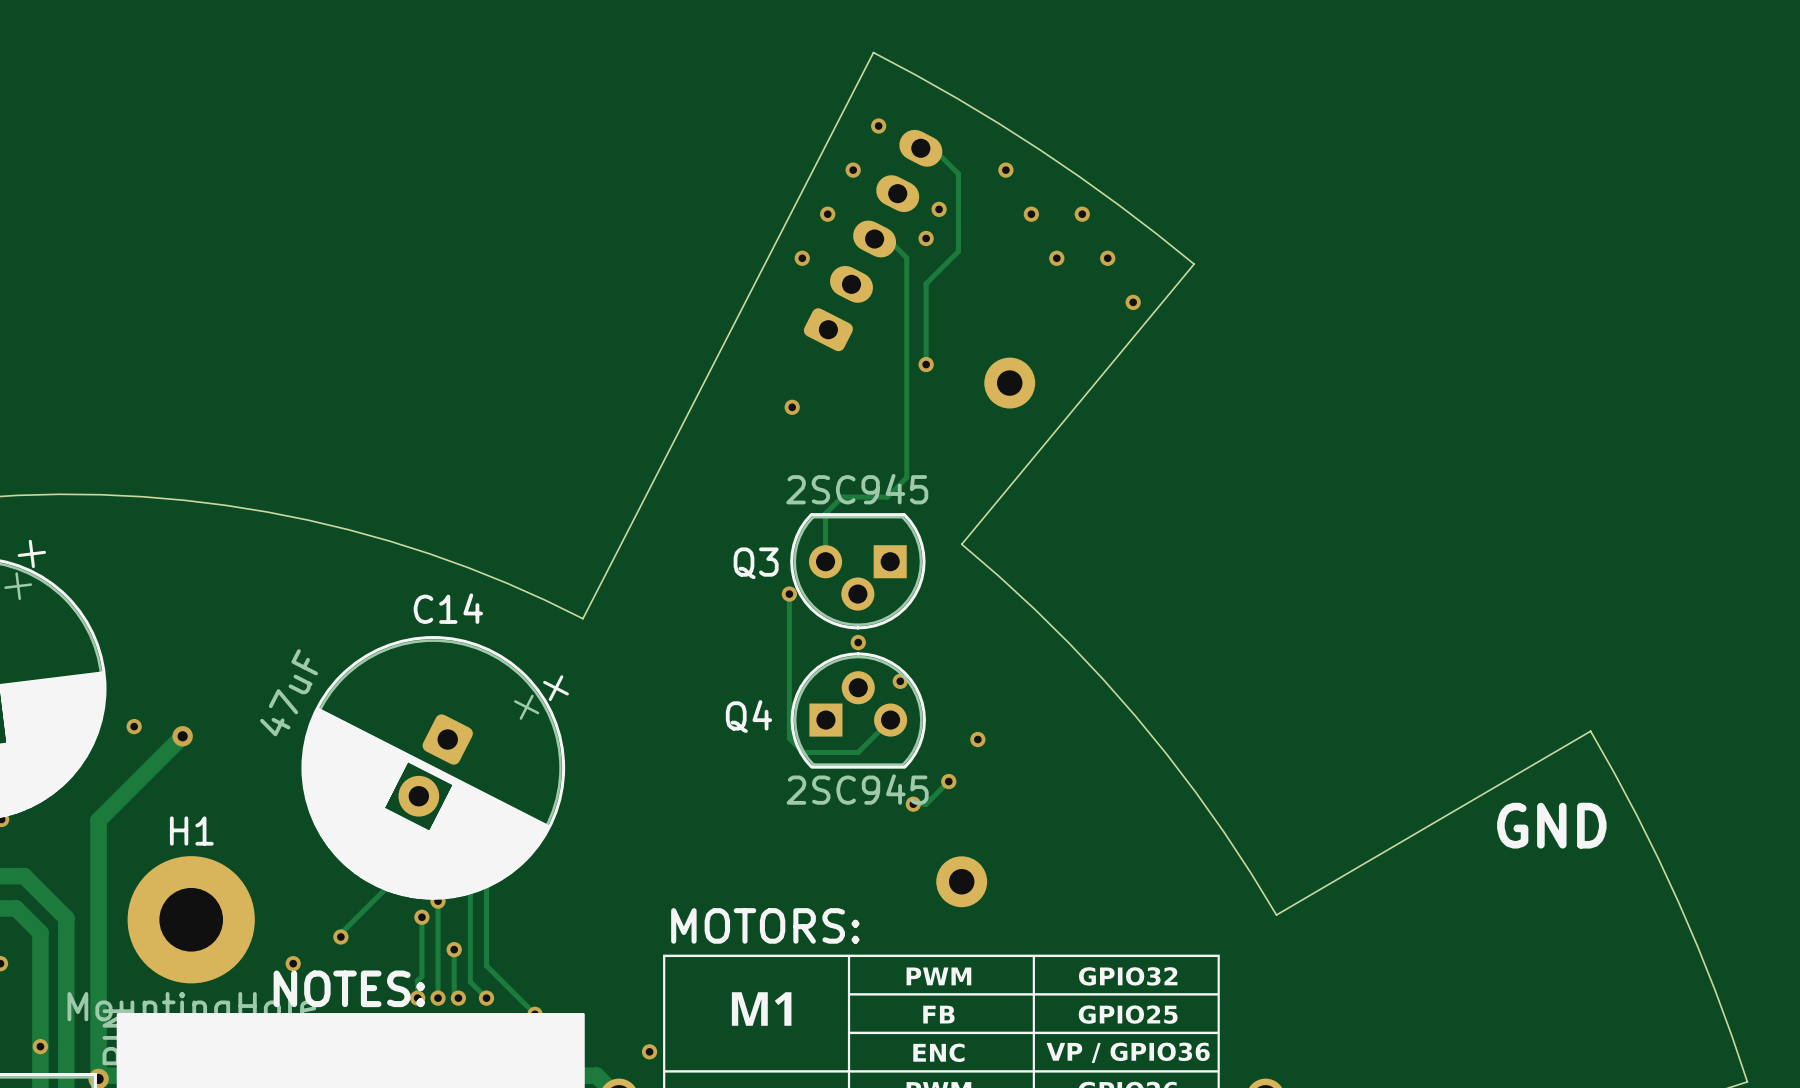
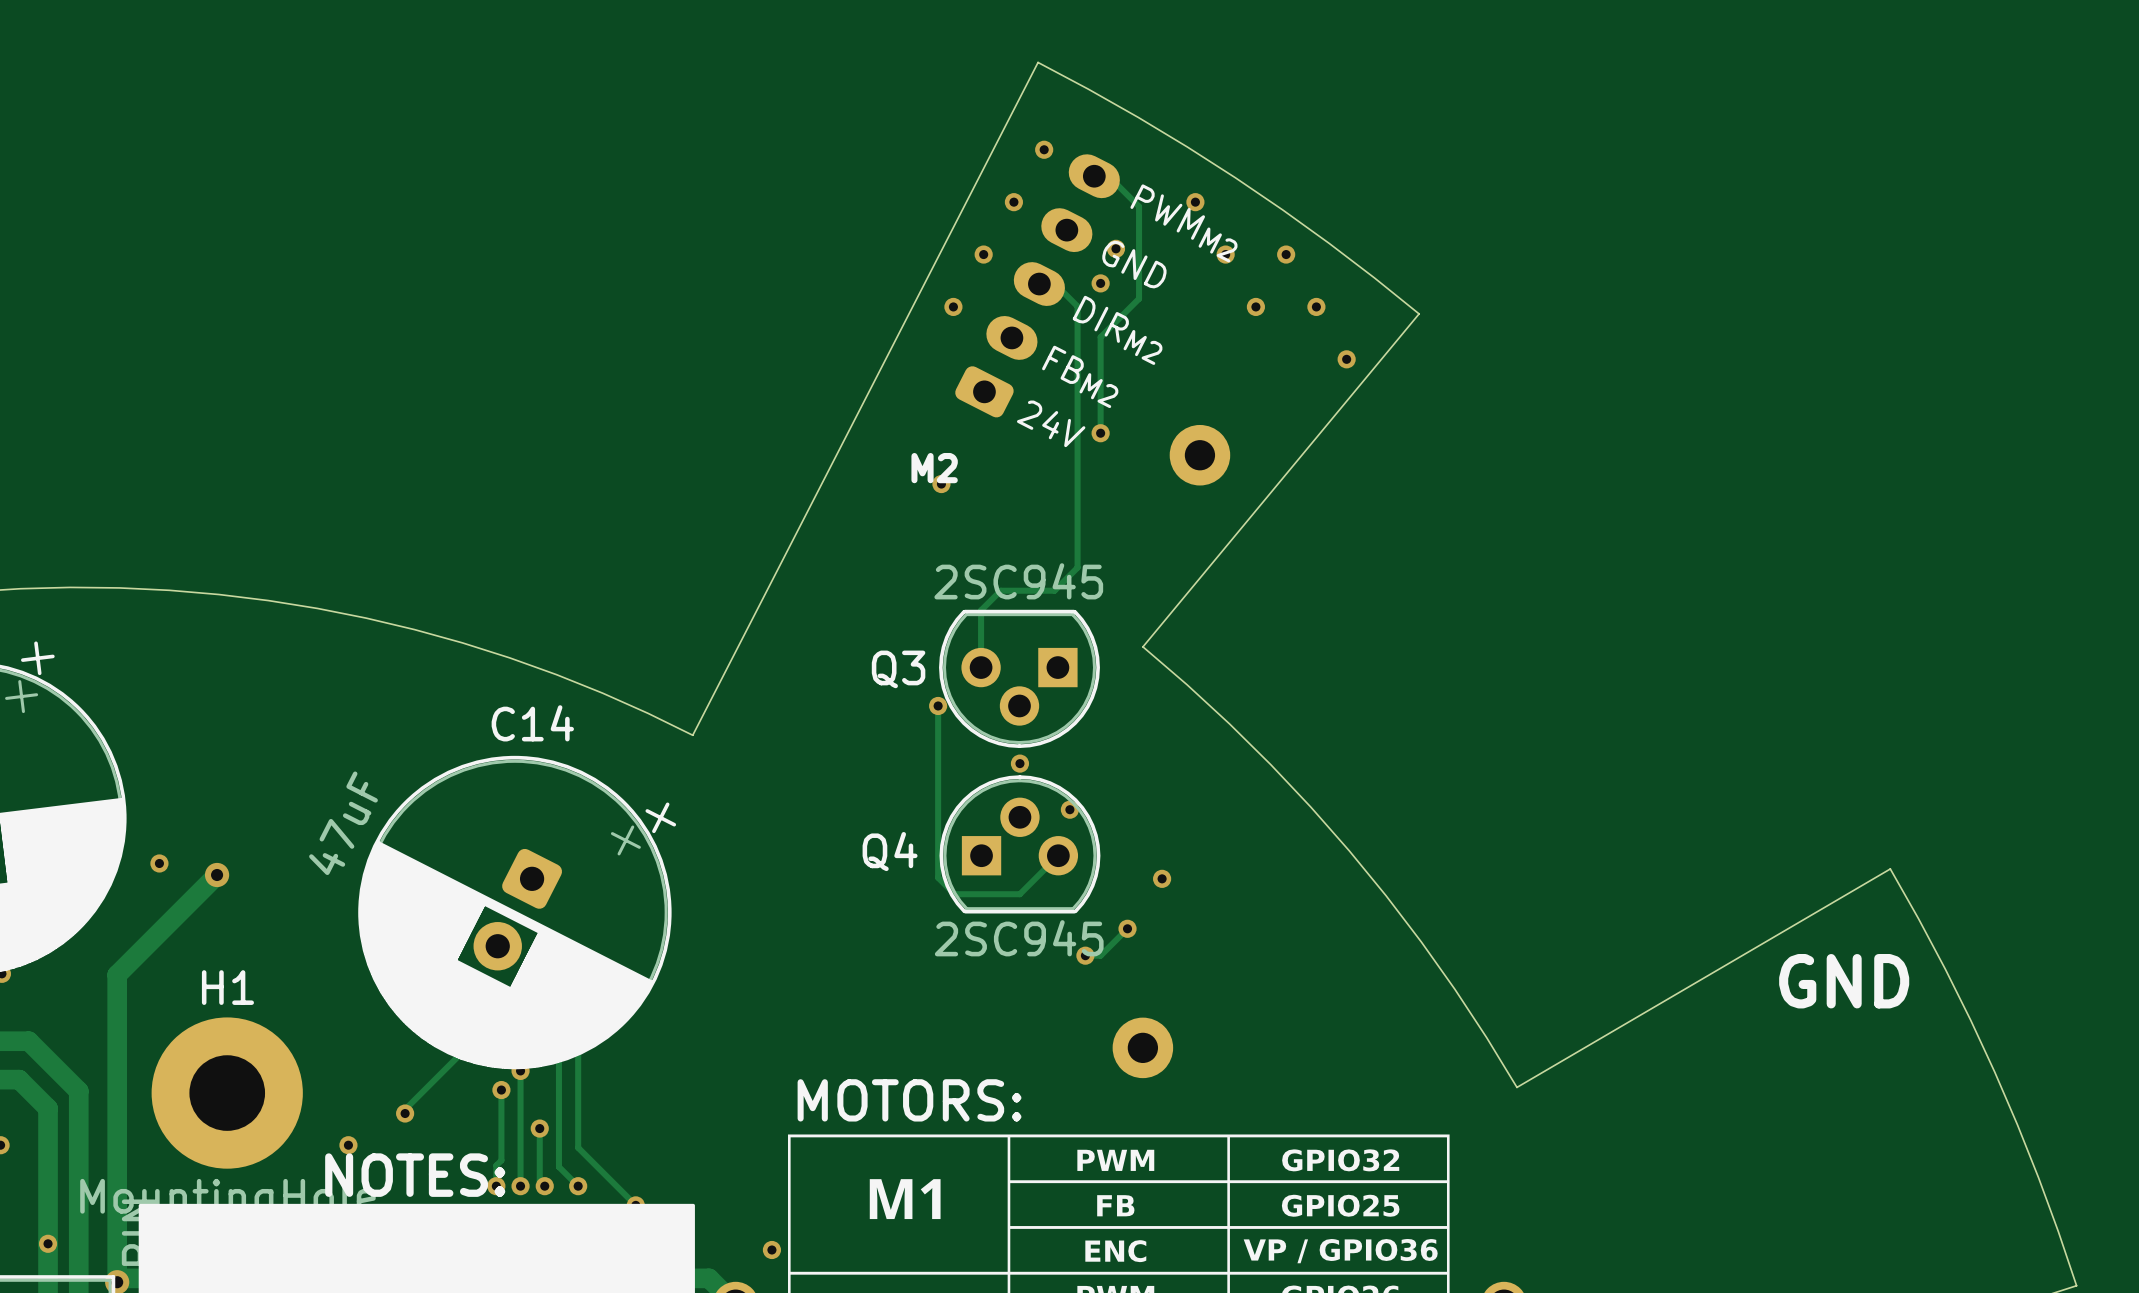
text: none -> PWMM2 (1183, 223)
text: none -> GND (1134, 264)
text: none -> DIRM2 (1117, 330)
text: none -> FBM2 (1080, 376)
text: none -> 24V (1051, 423)
text: none -> M2 (934, 468)

